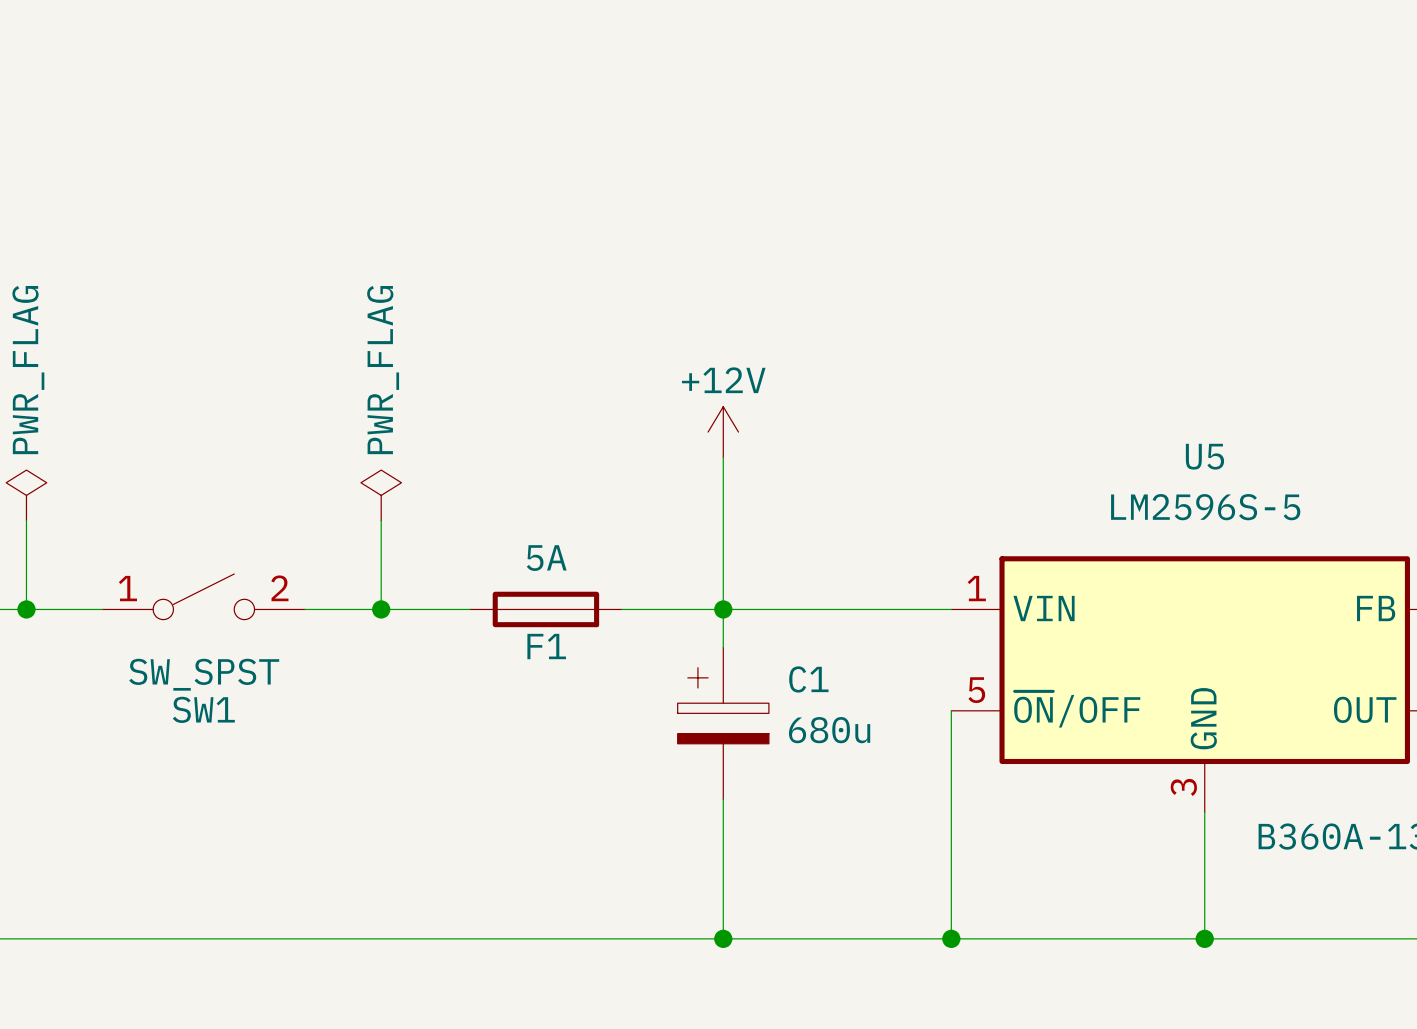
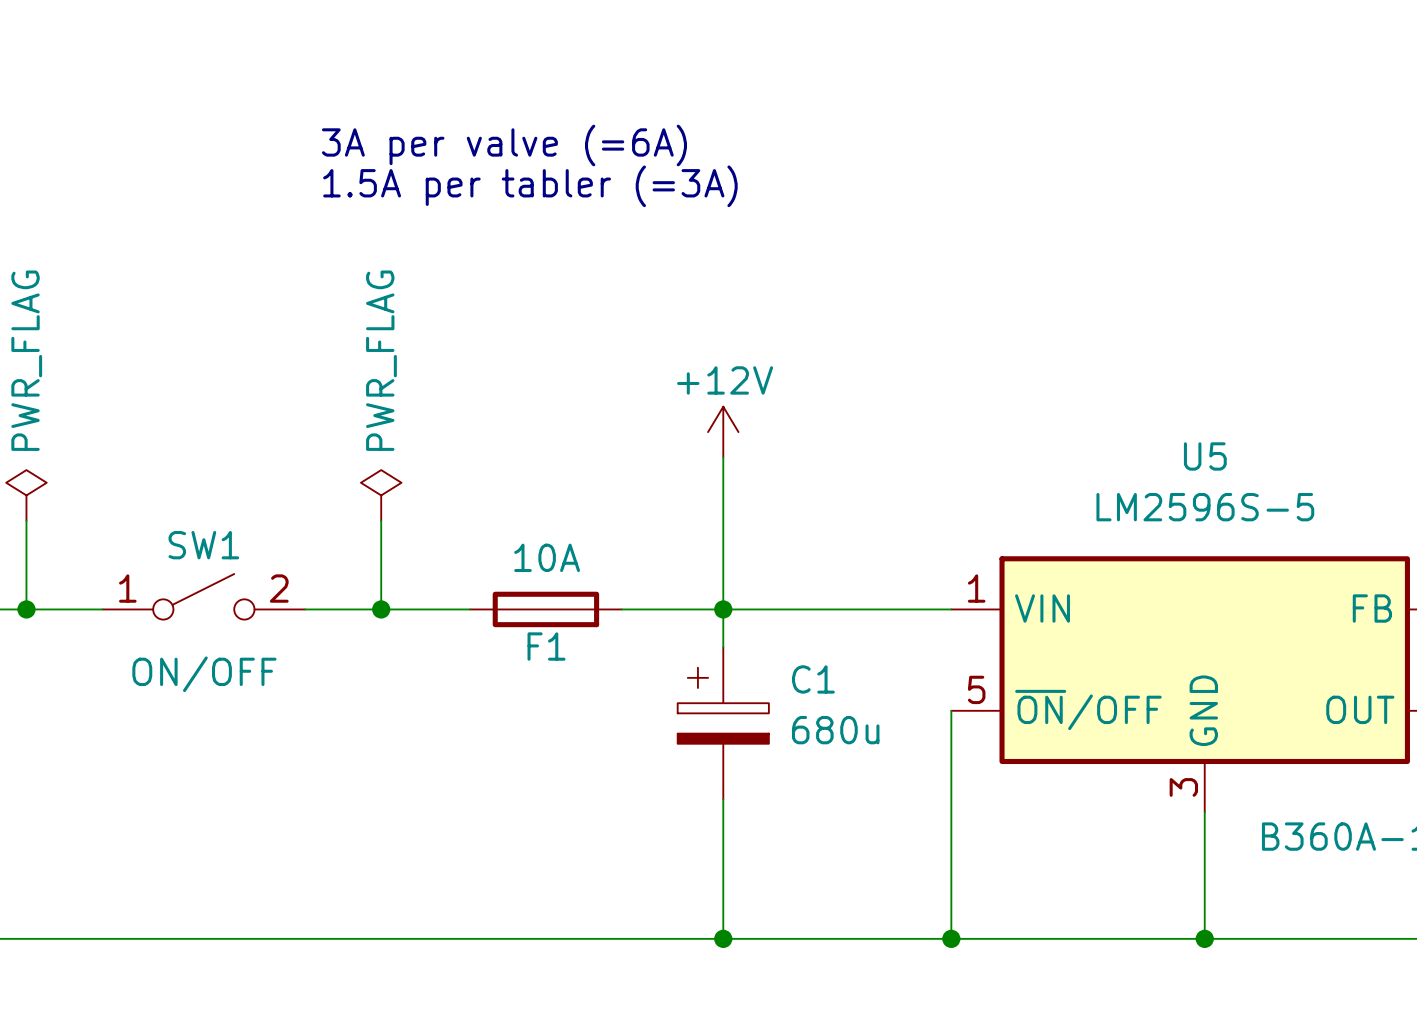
text: none -> 3A per valve (=6A) (504, 145)
text: none -> 1.5A per tabler (=3A) (530, 186)
F1 value: 5A (546, 558) -> 10A (547, 557)
SW1 value: SW_SPST (204, 674) -> ON/OFF (204, 674)
SW1 name position: SW1 (203, 709) -> SW1 (203, 545)

